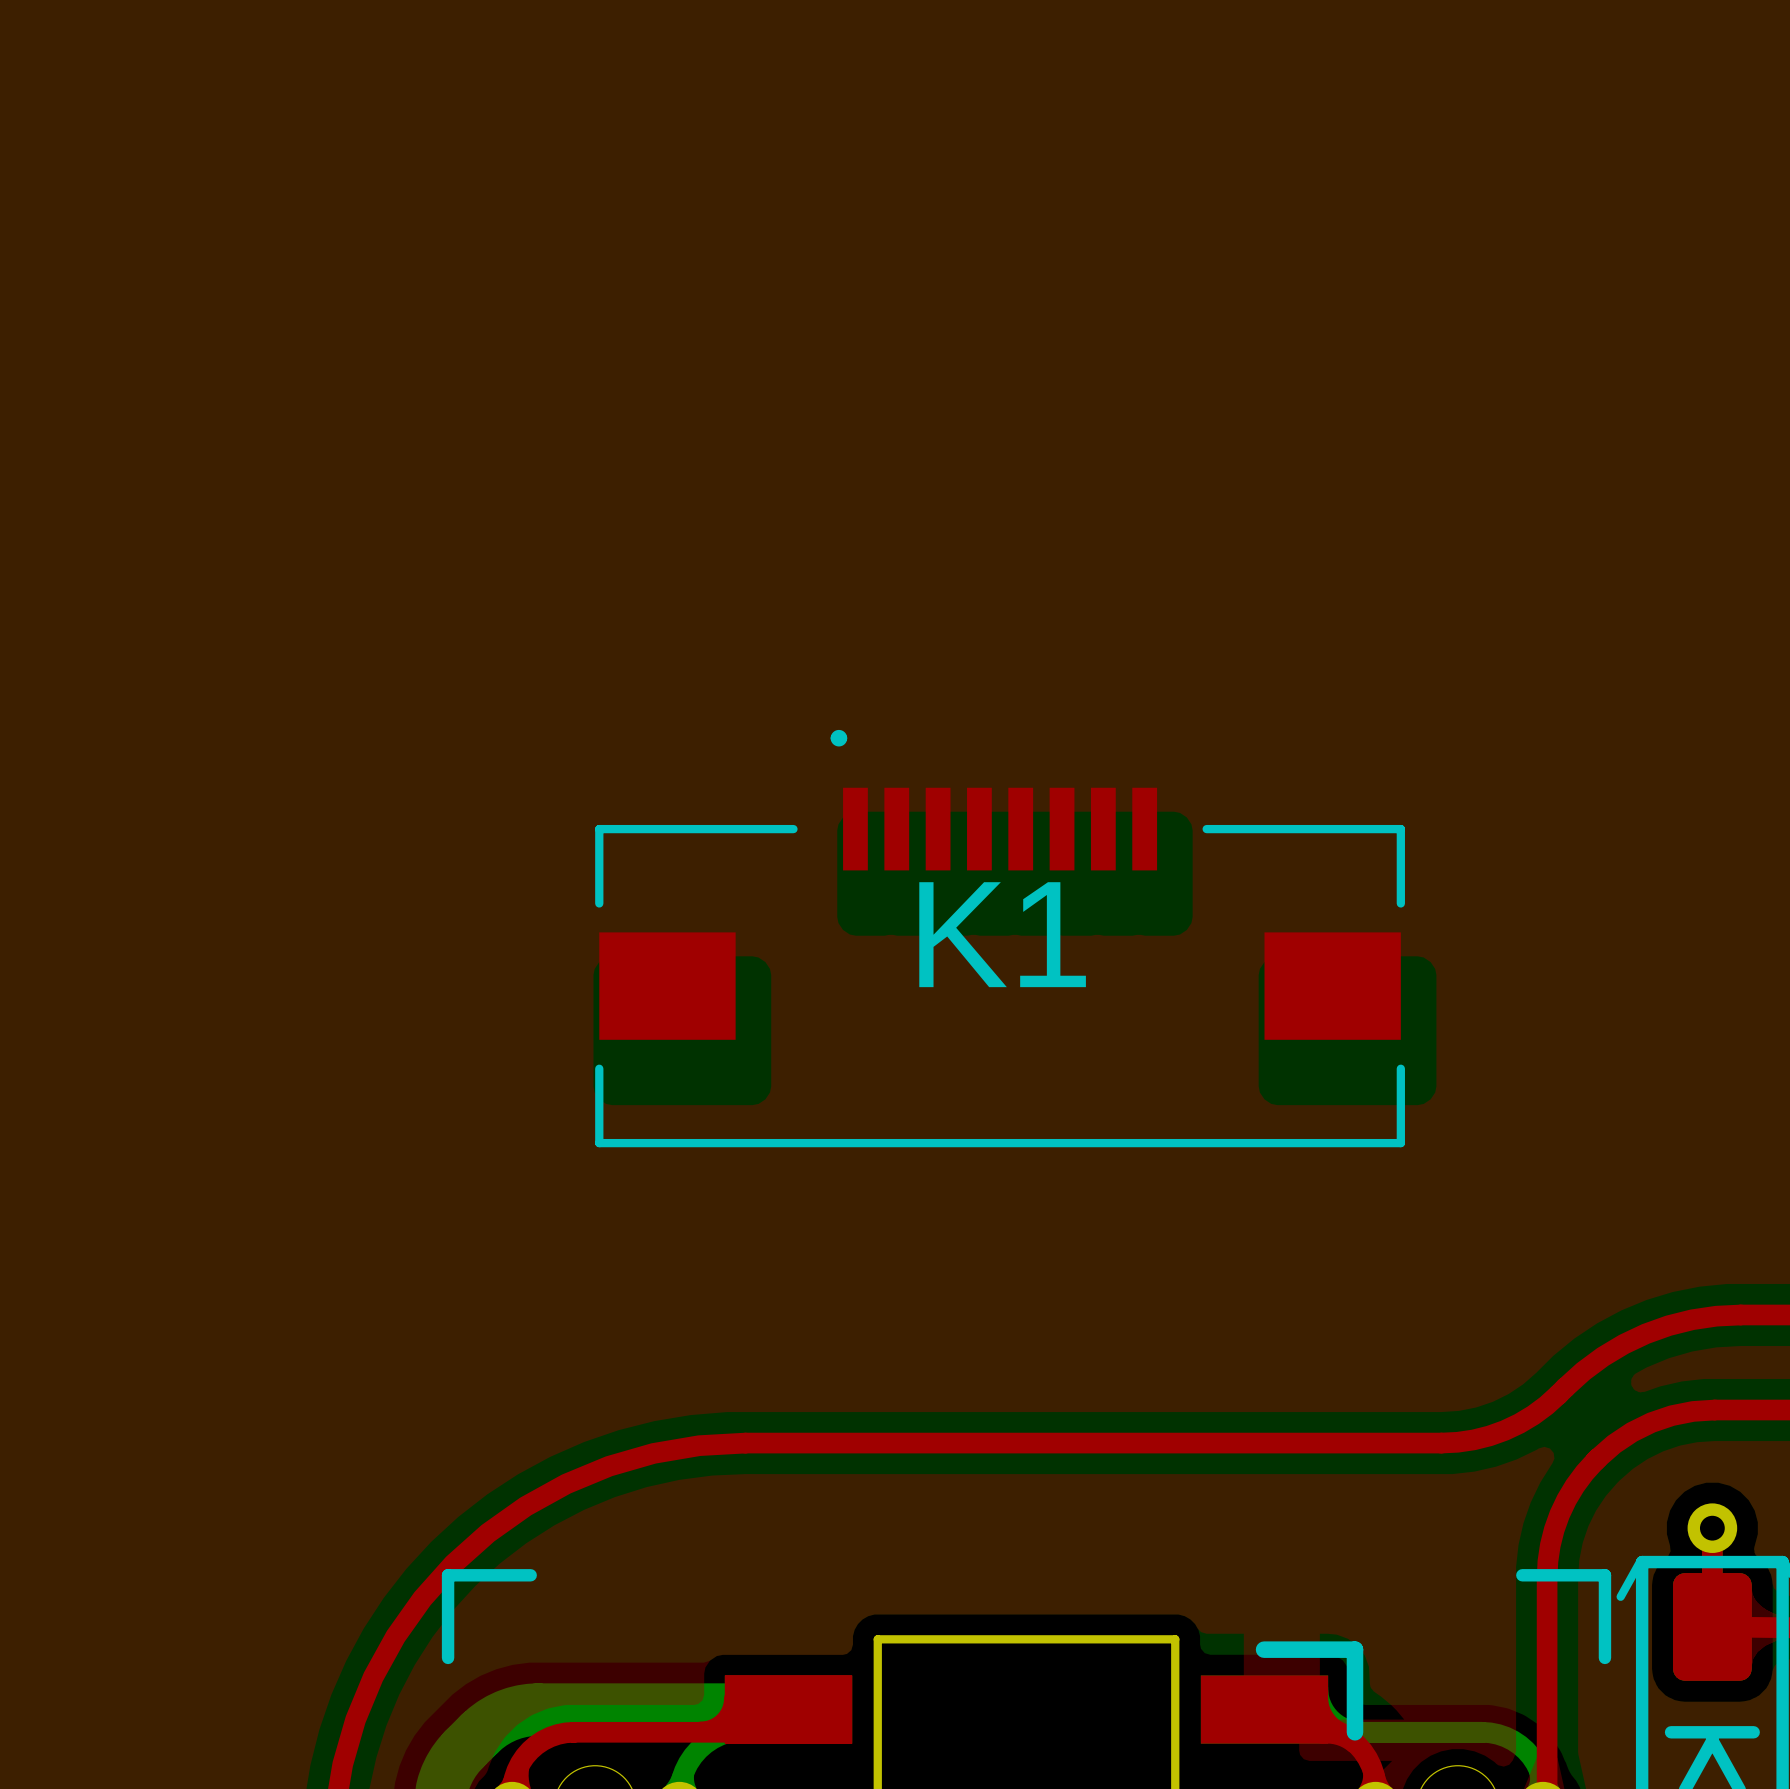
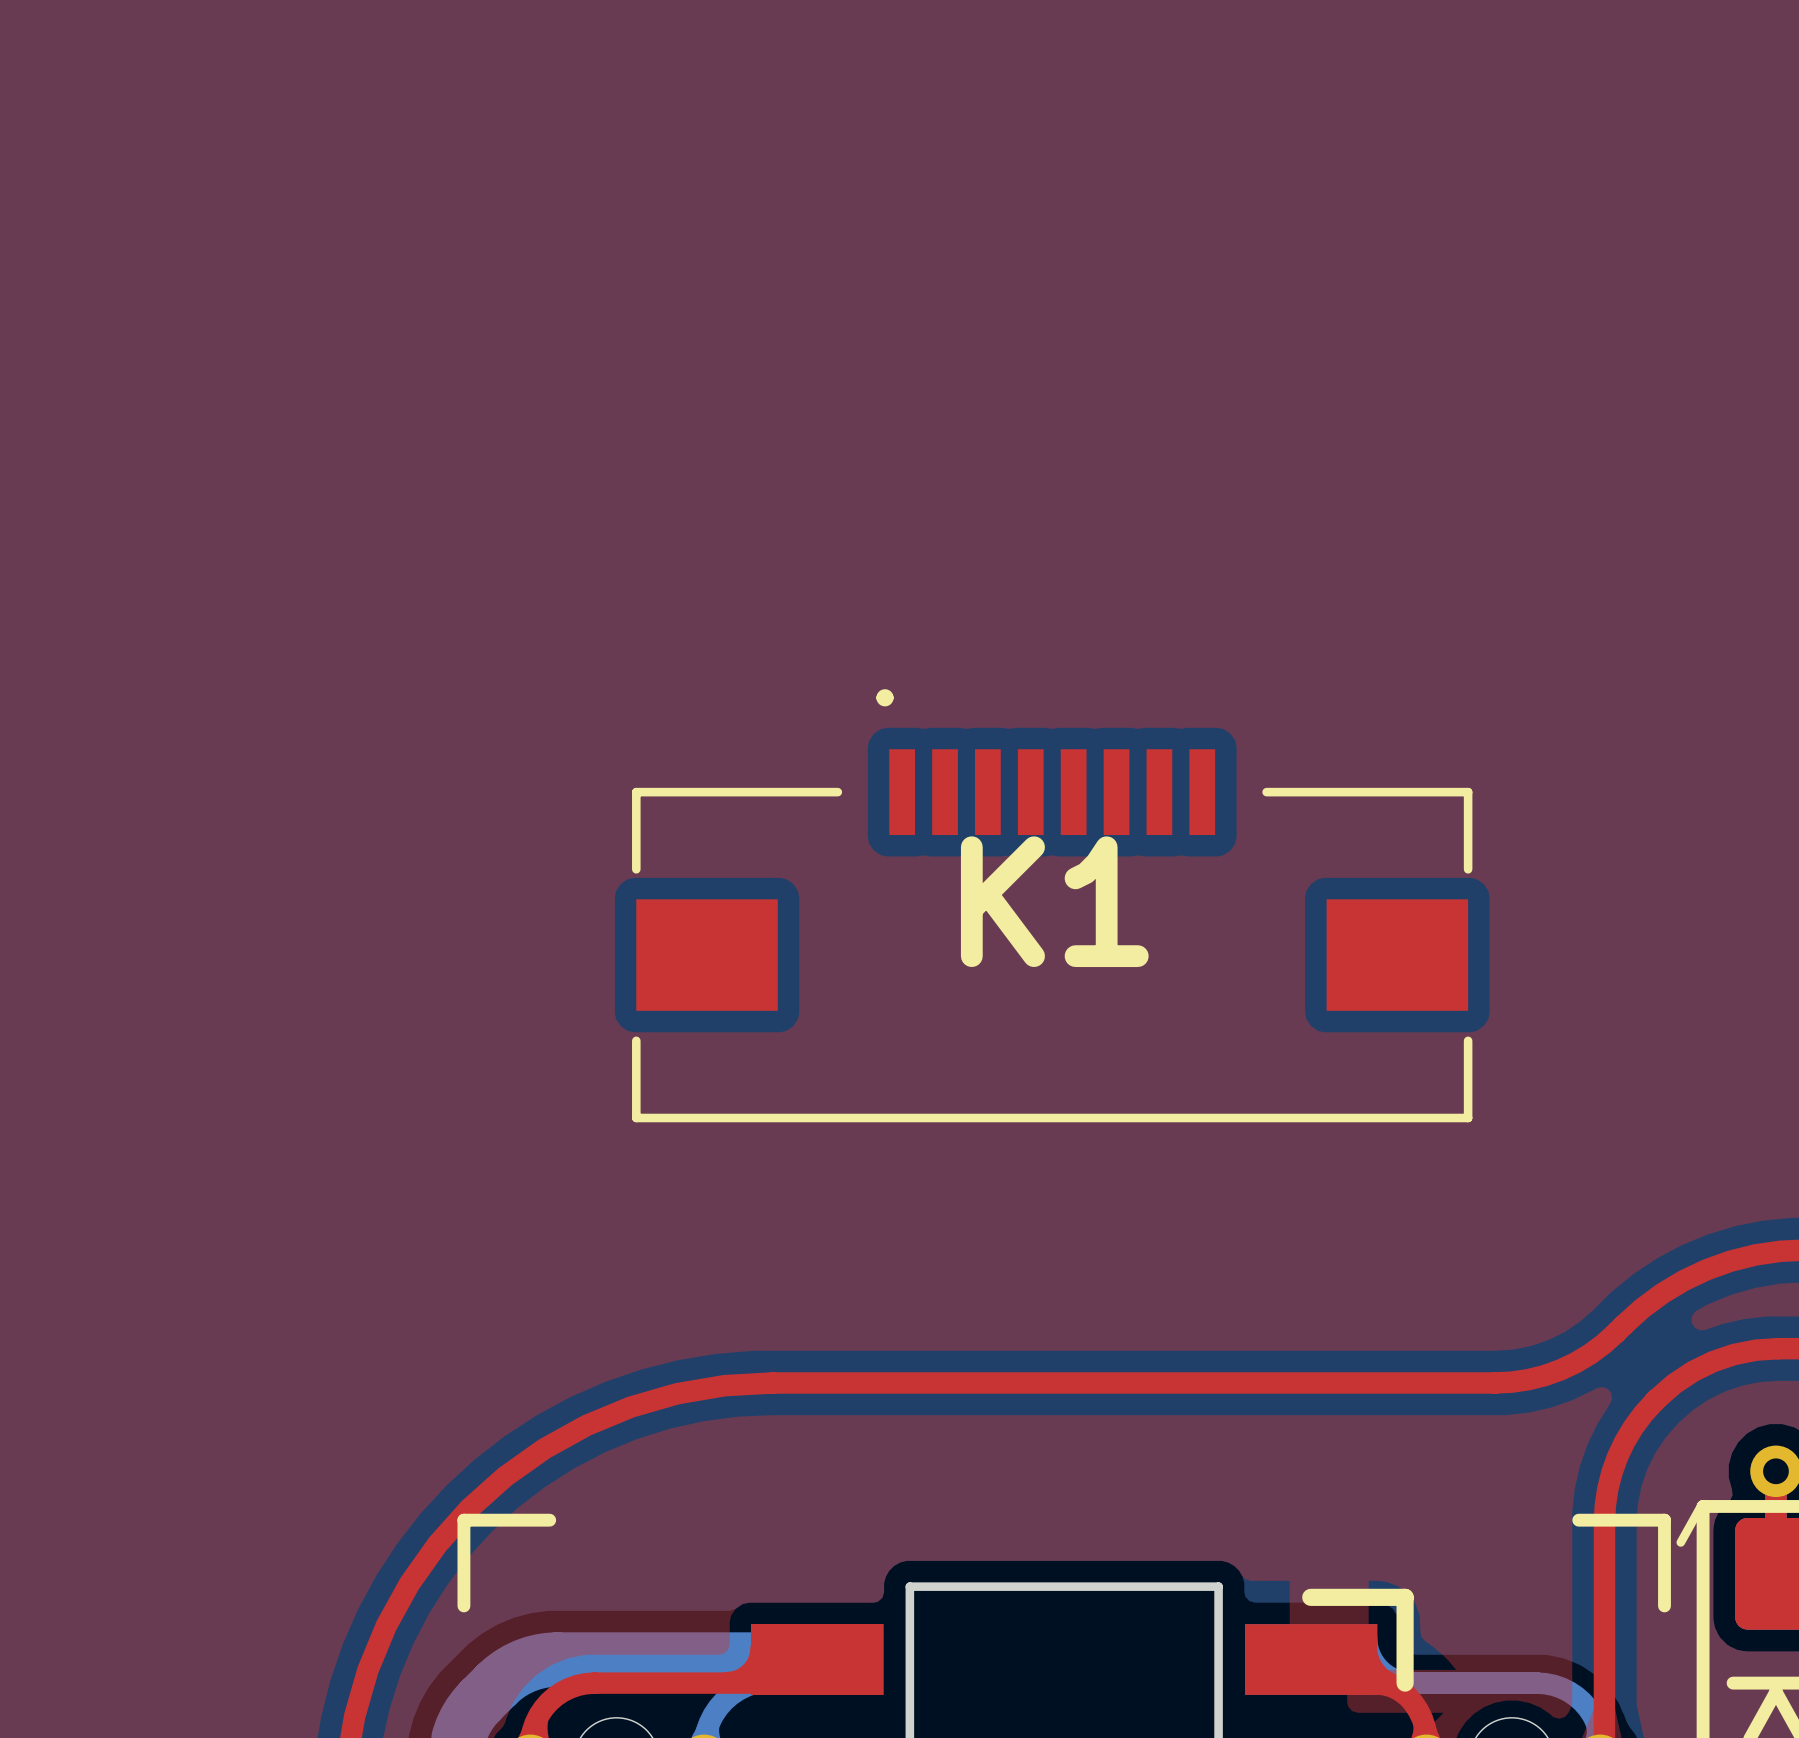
K1 position: (1000, 938) -> (1052, 905)

